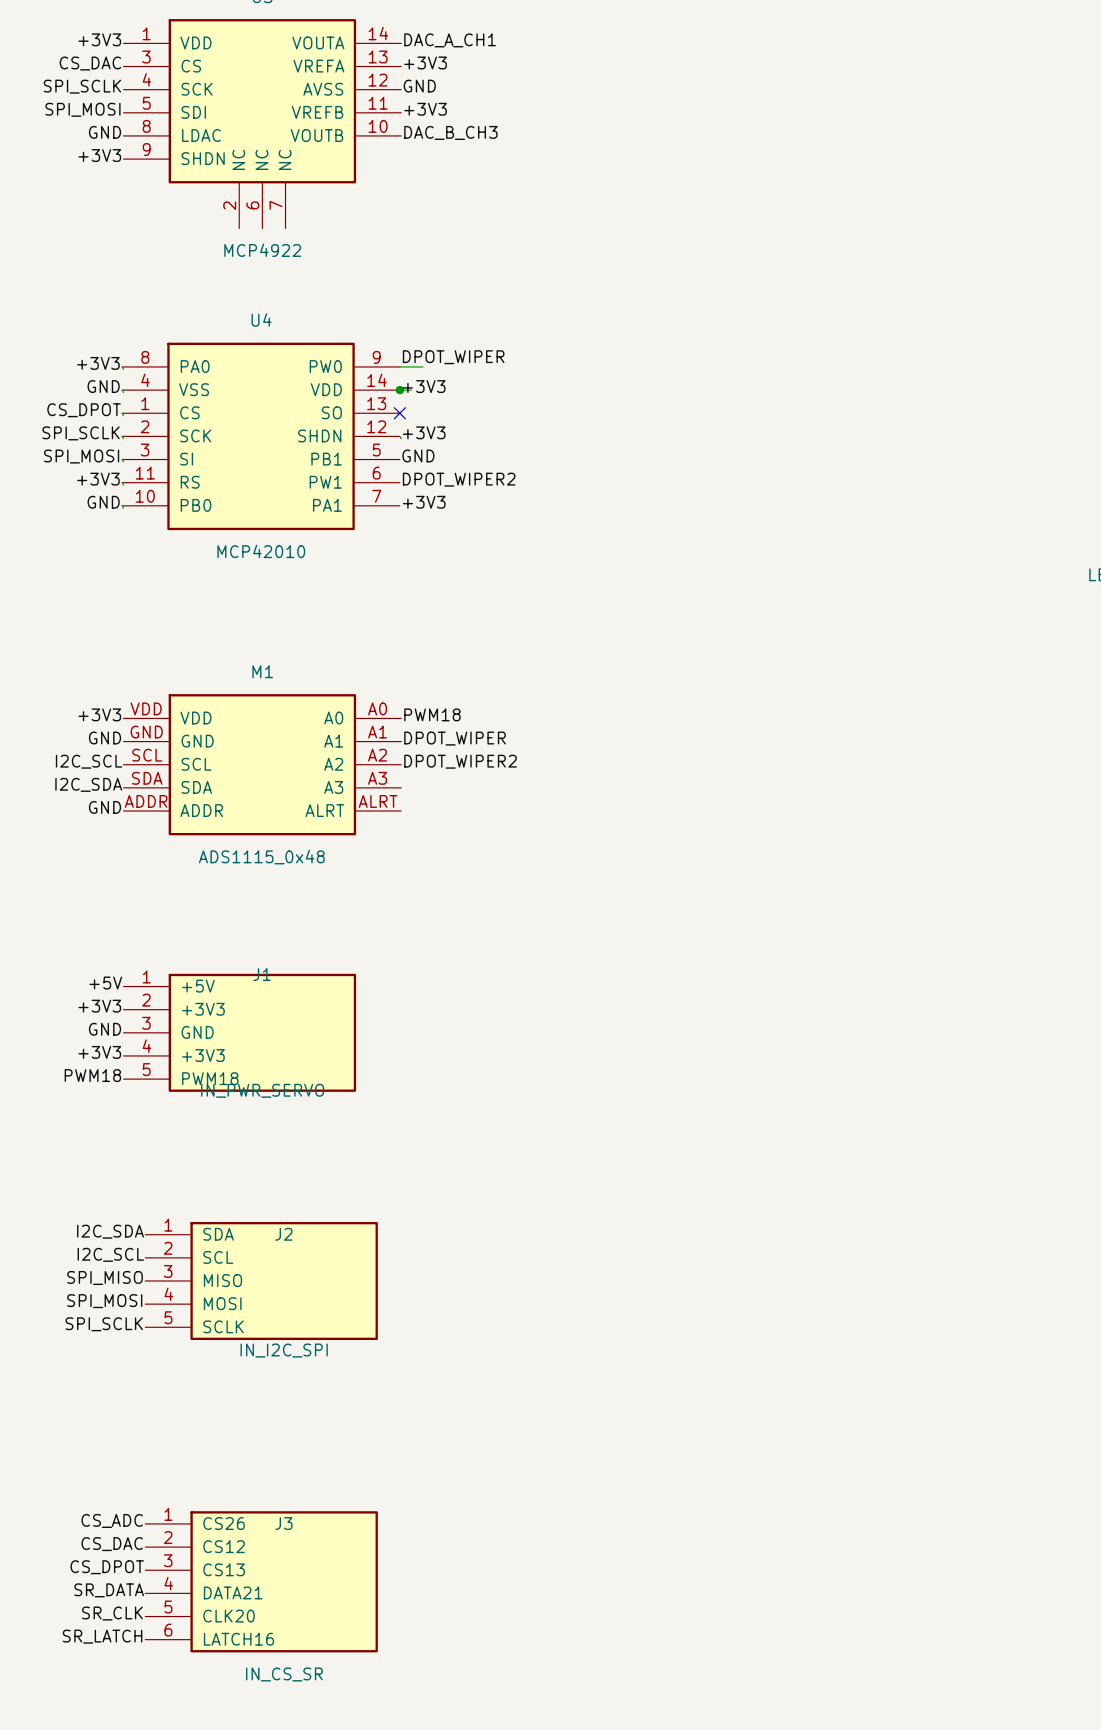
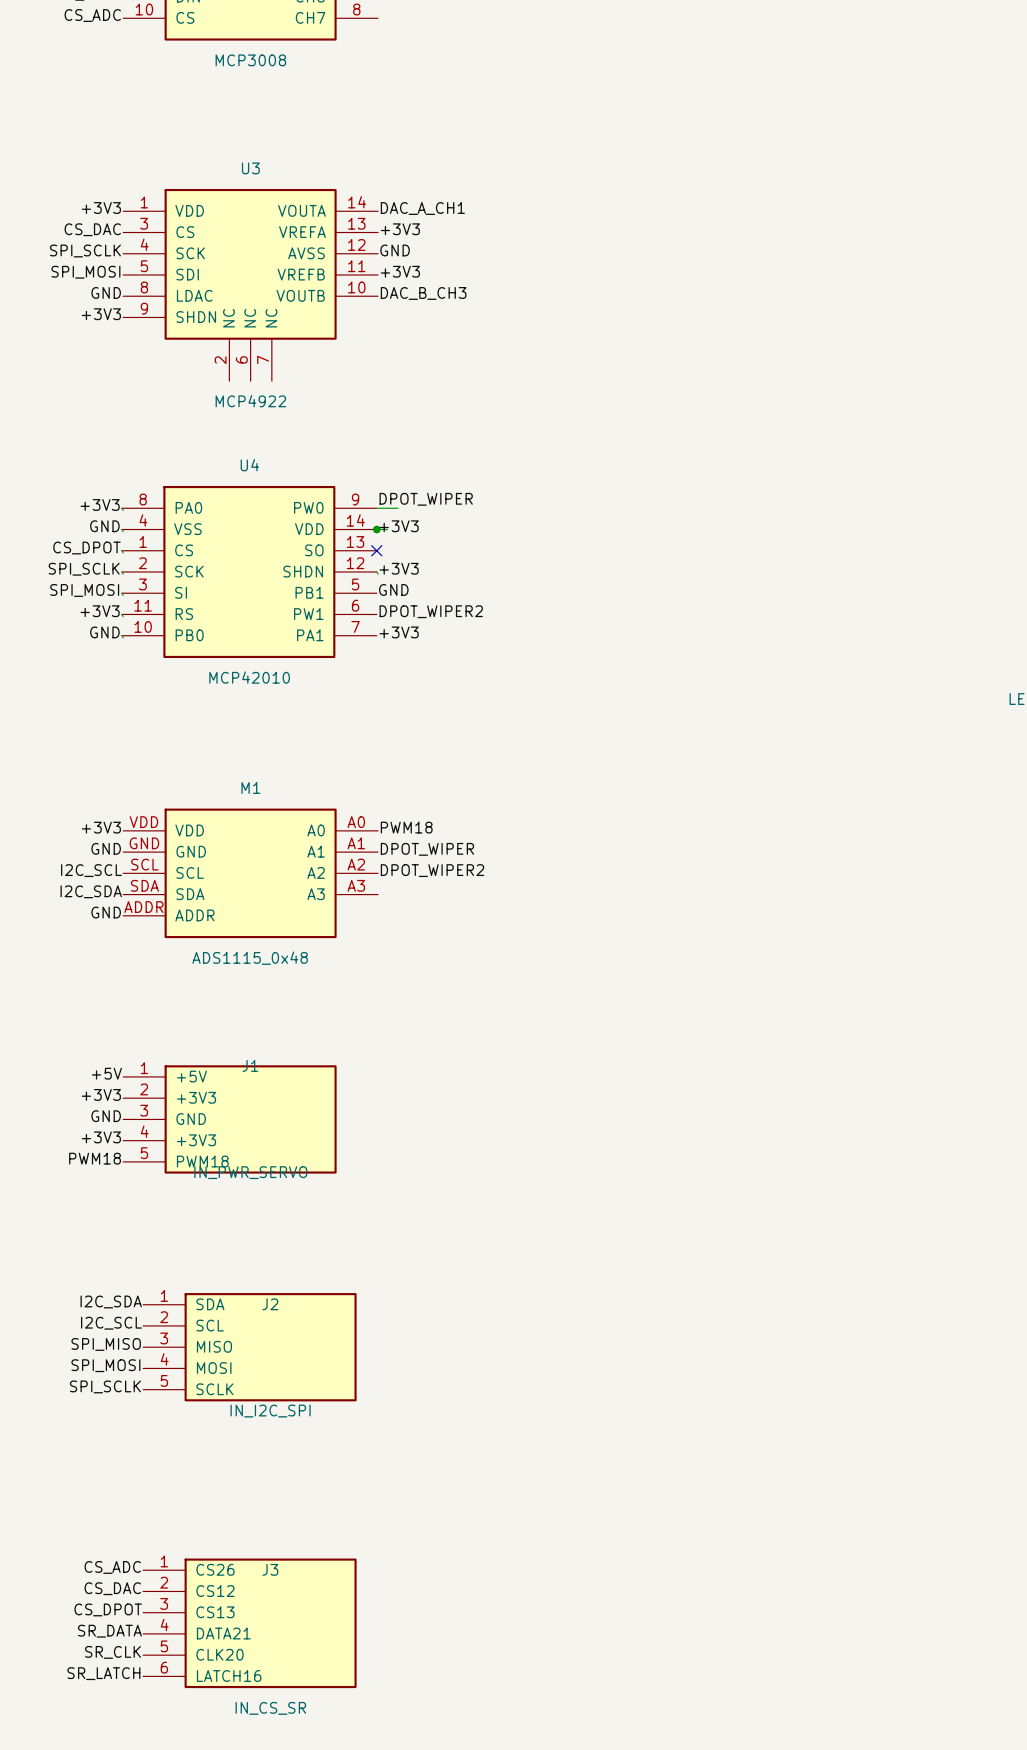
M1 symbol: [123, 694, 402, 836] -> [123, 808, 379, 939]

